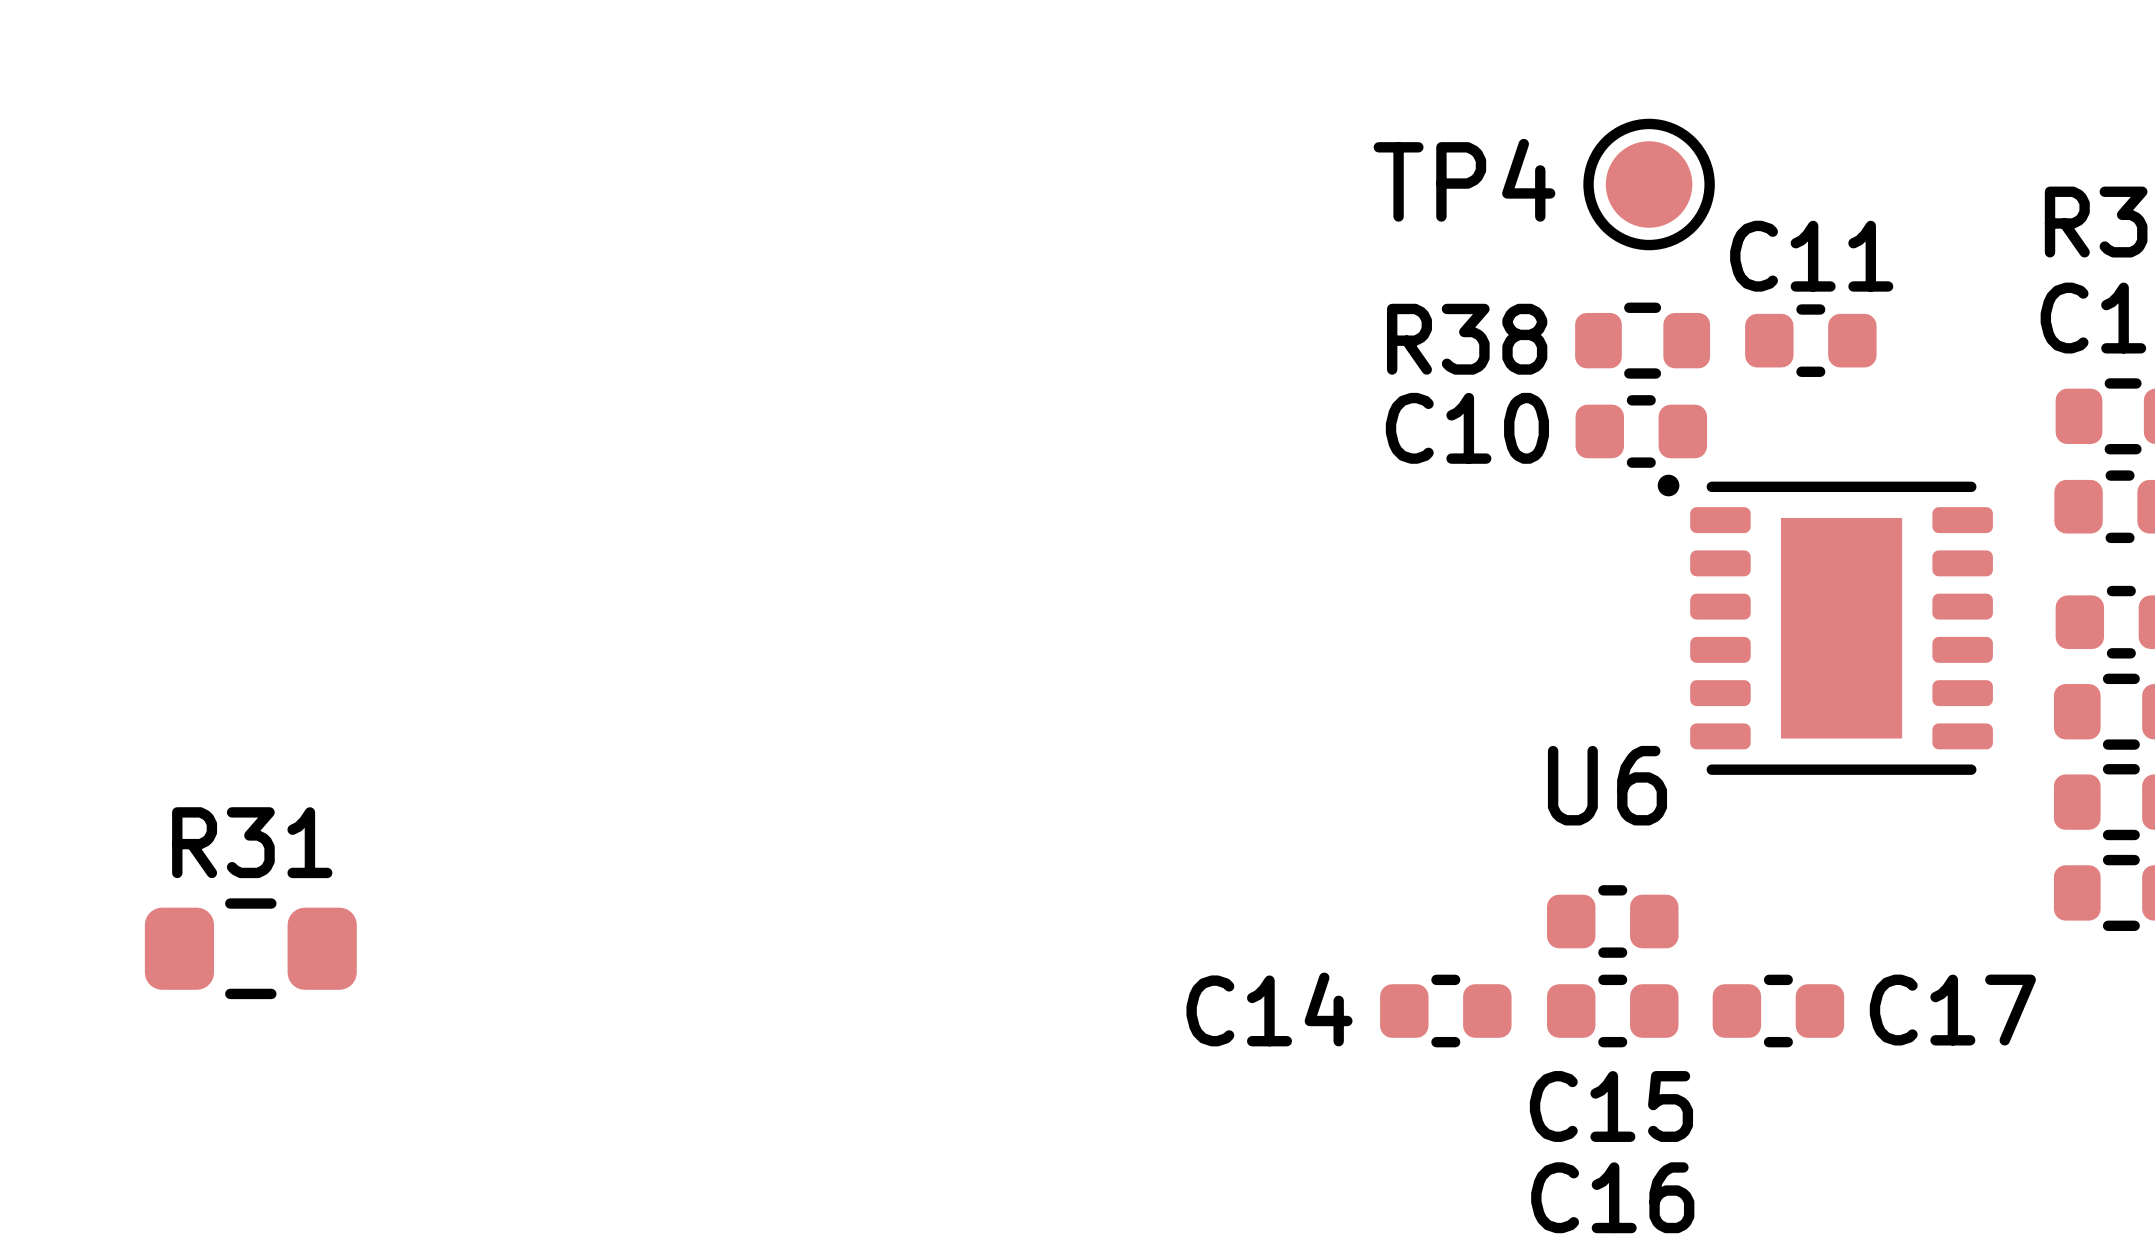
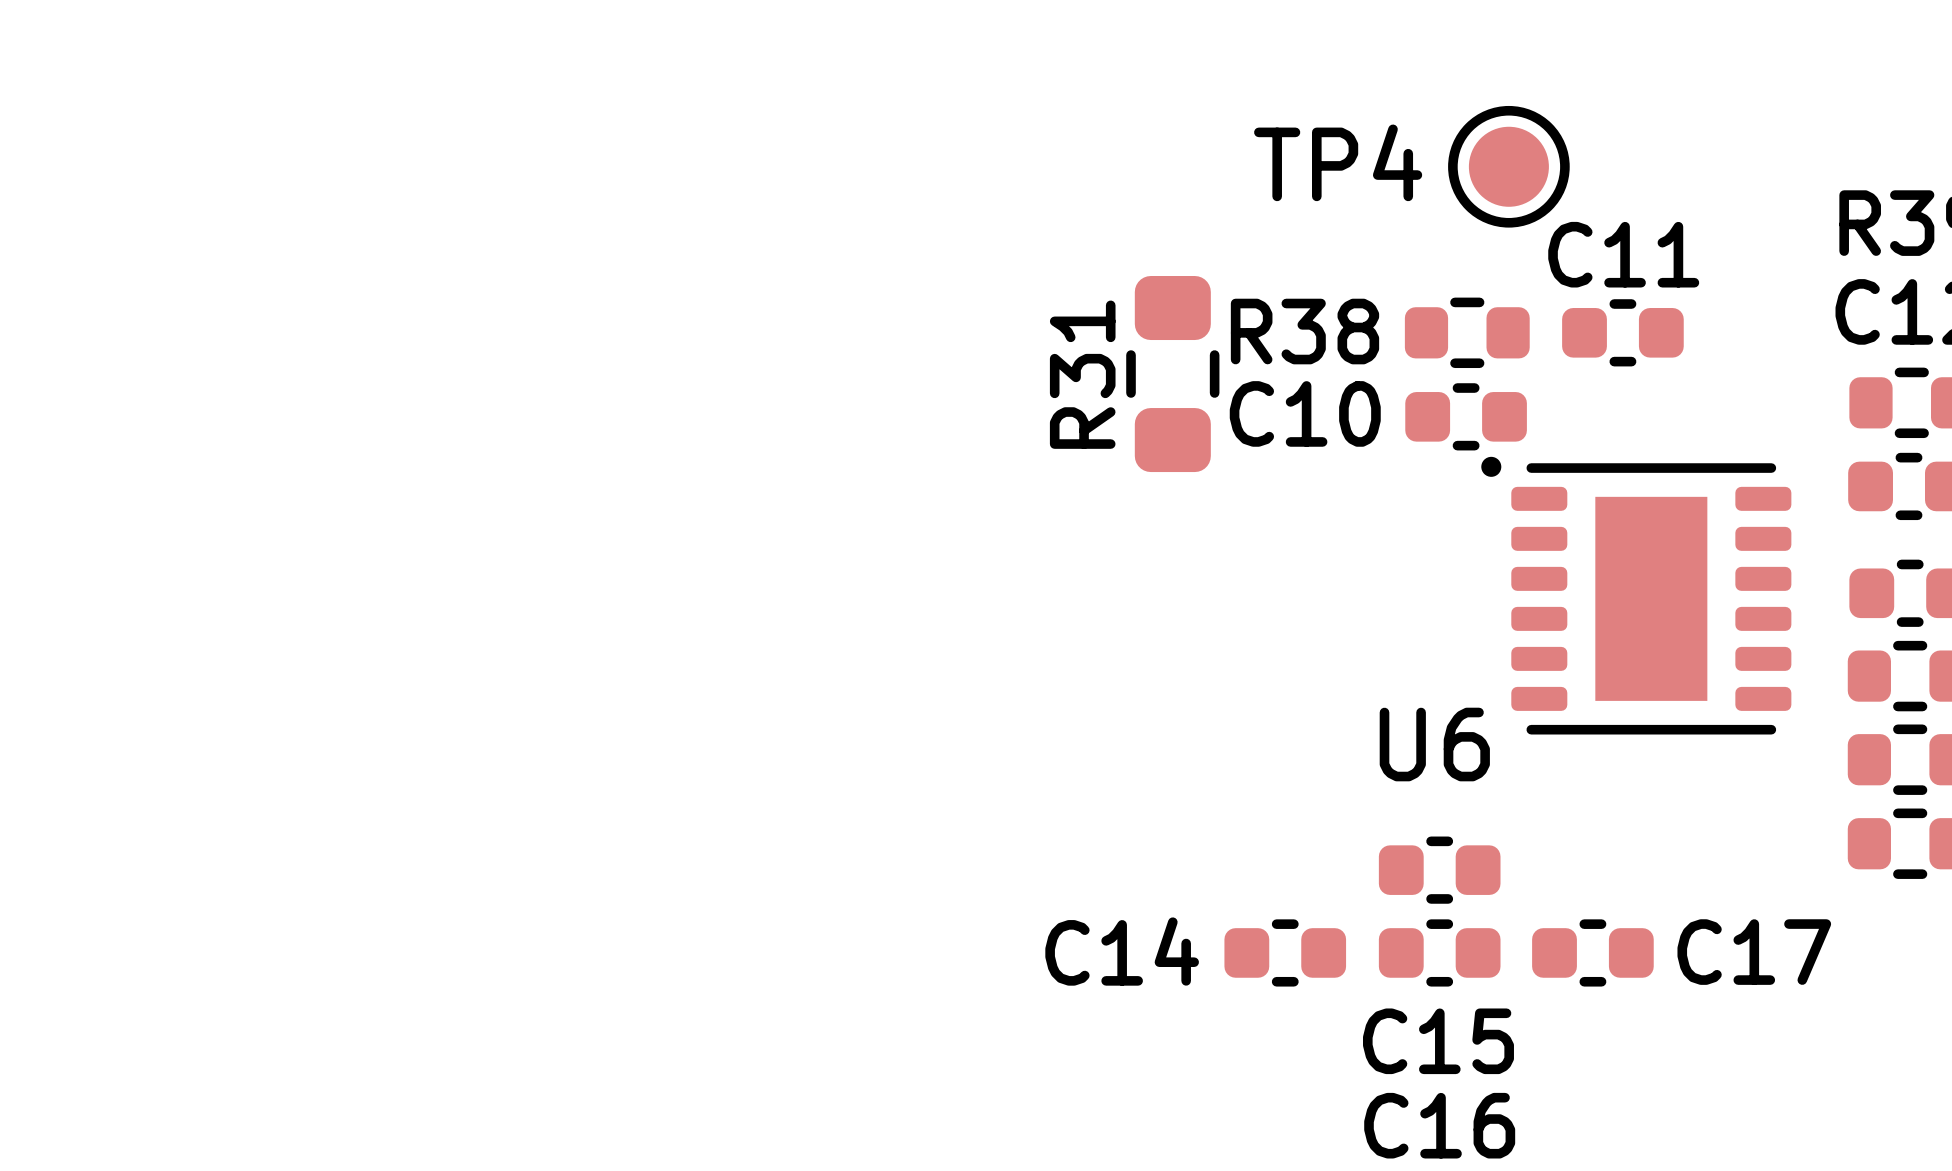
TP4 position: (1649, 184) -> (1508, 166)
R31 rotation: 0° (250, 948) -> 90° clockwise (1172, 374)
R31 position: (250, 948) -> (1172, 374)

